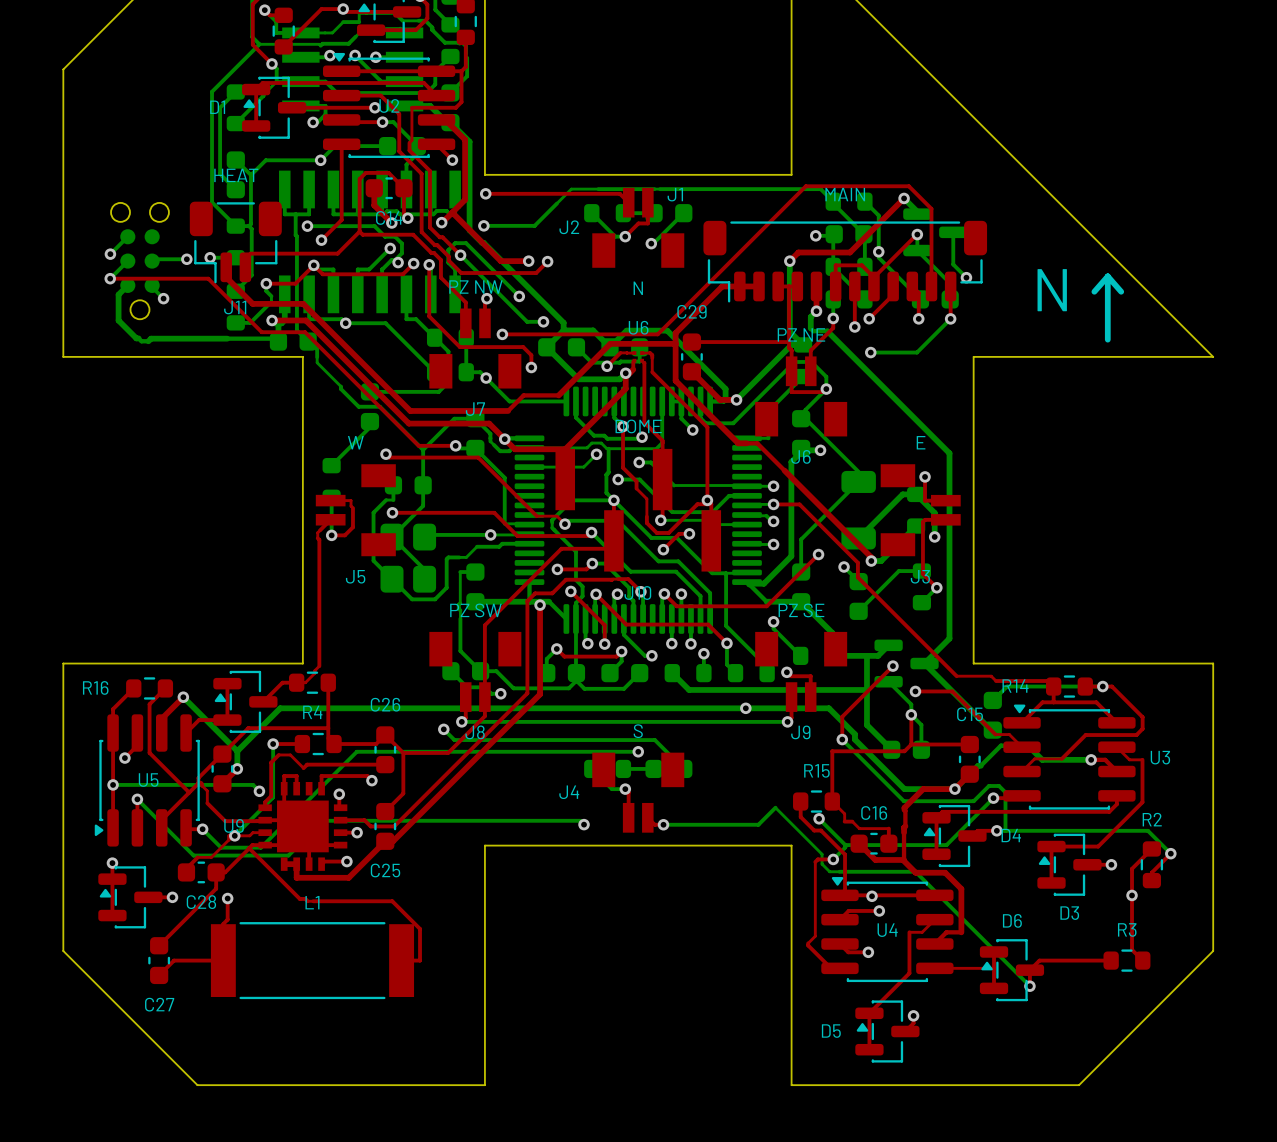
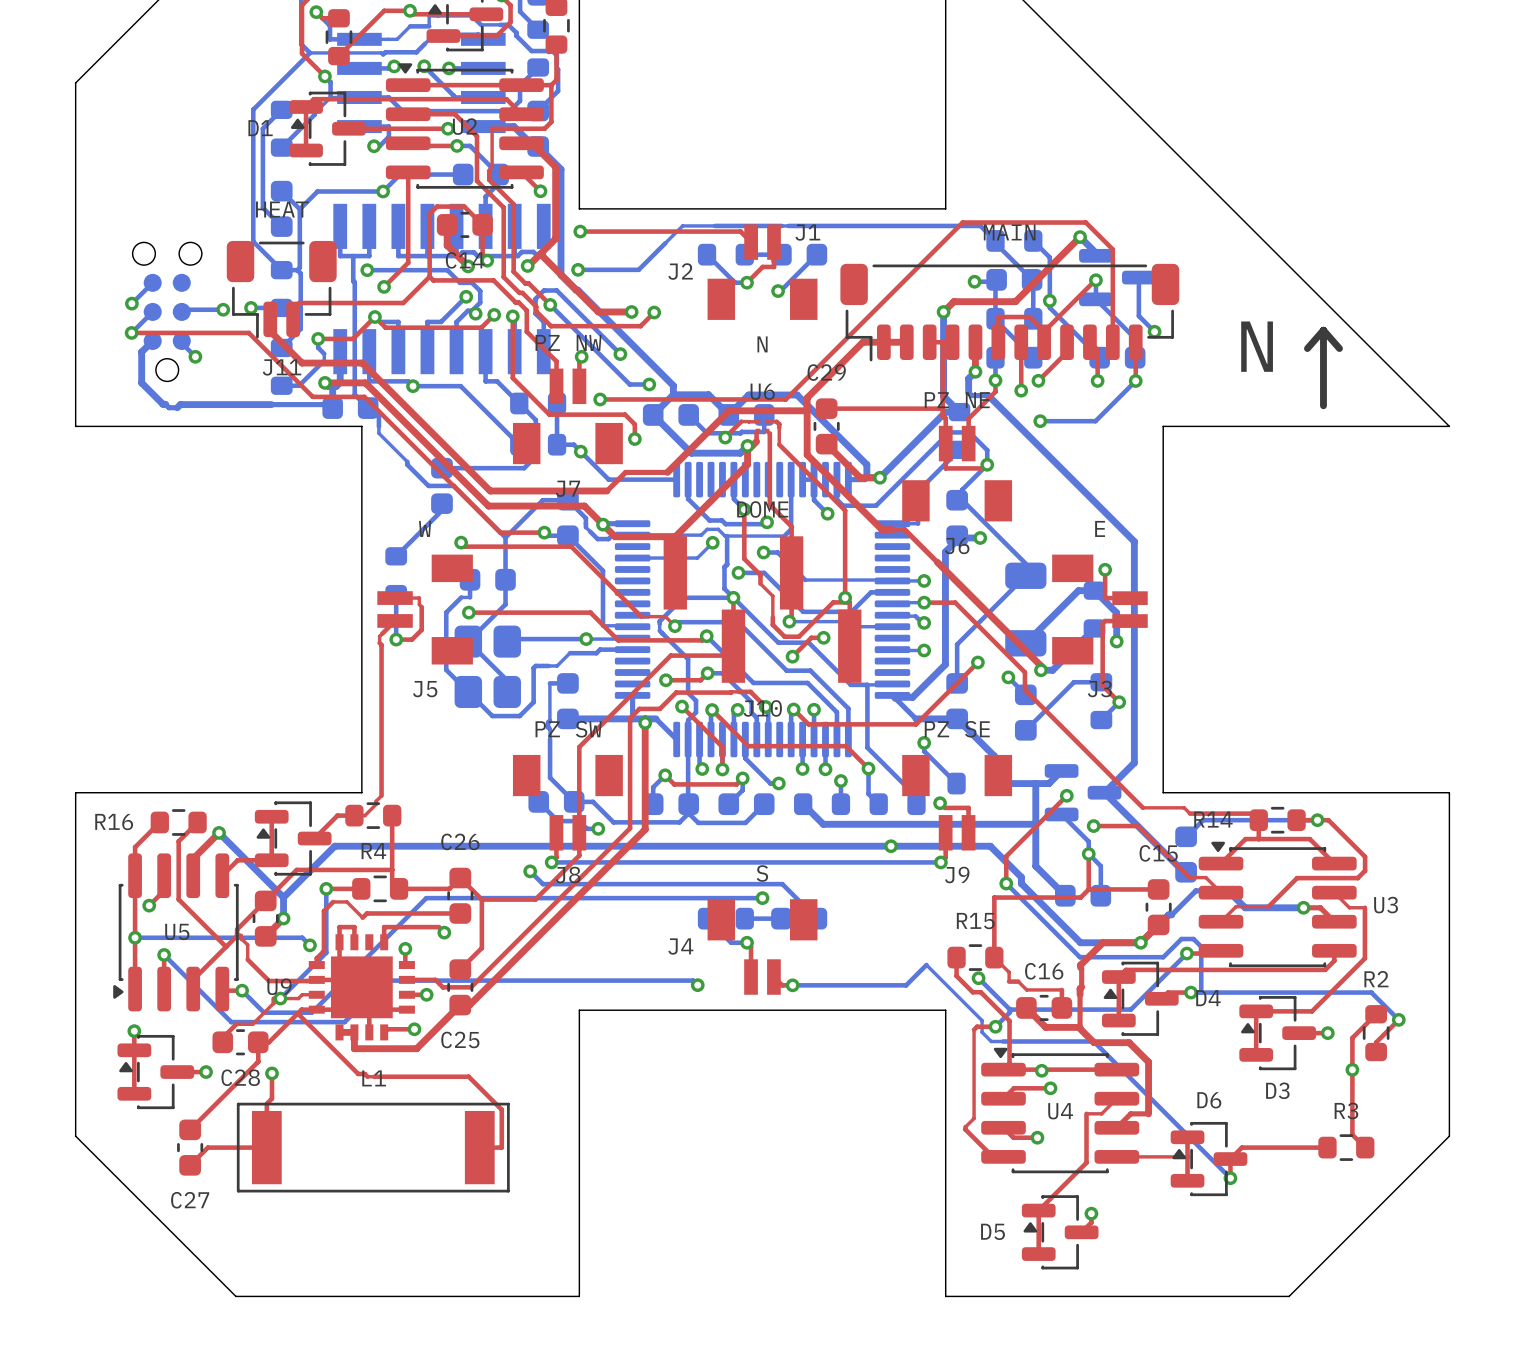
L1 footprint: [210, 922, 415, 1000] -> [236, 1102, 510, 1193]

